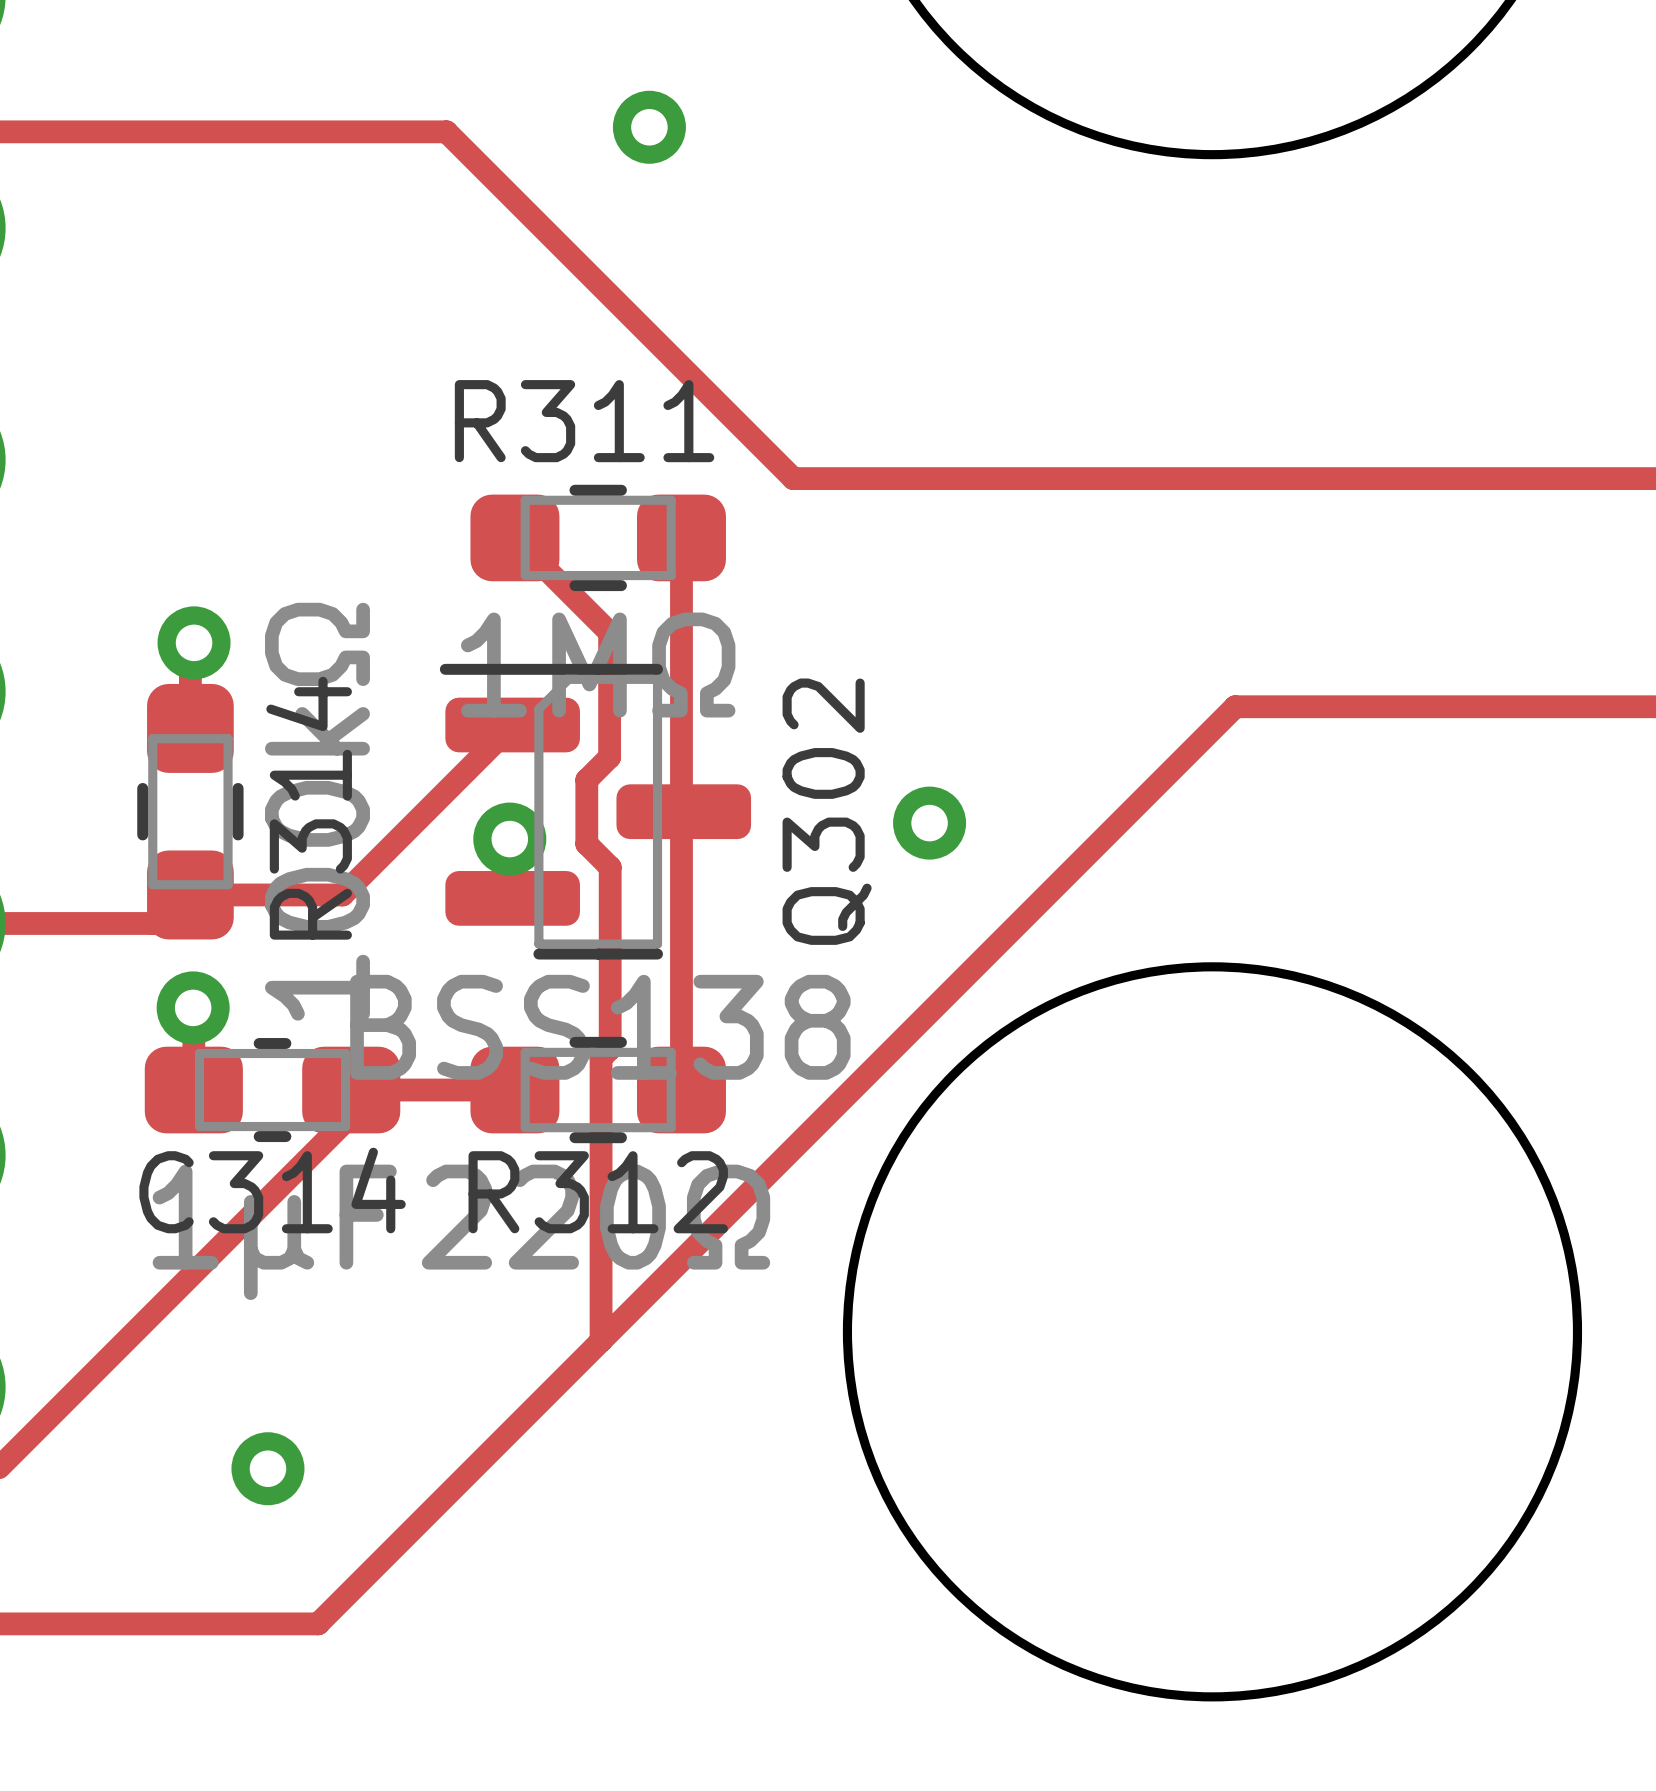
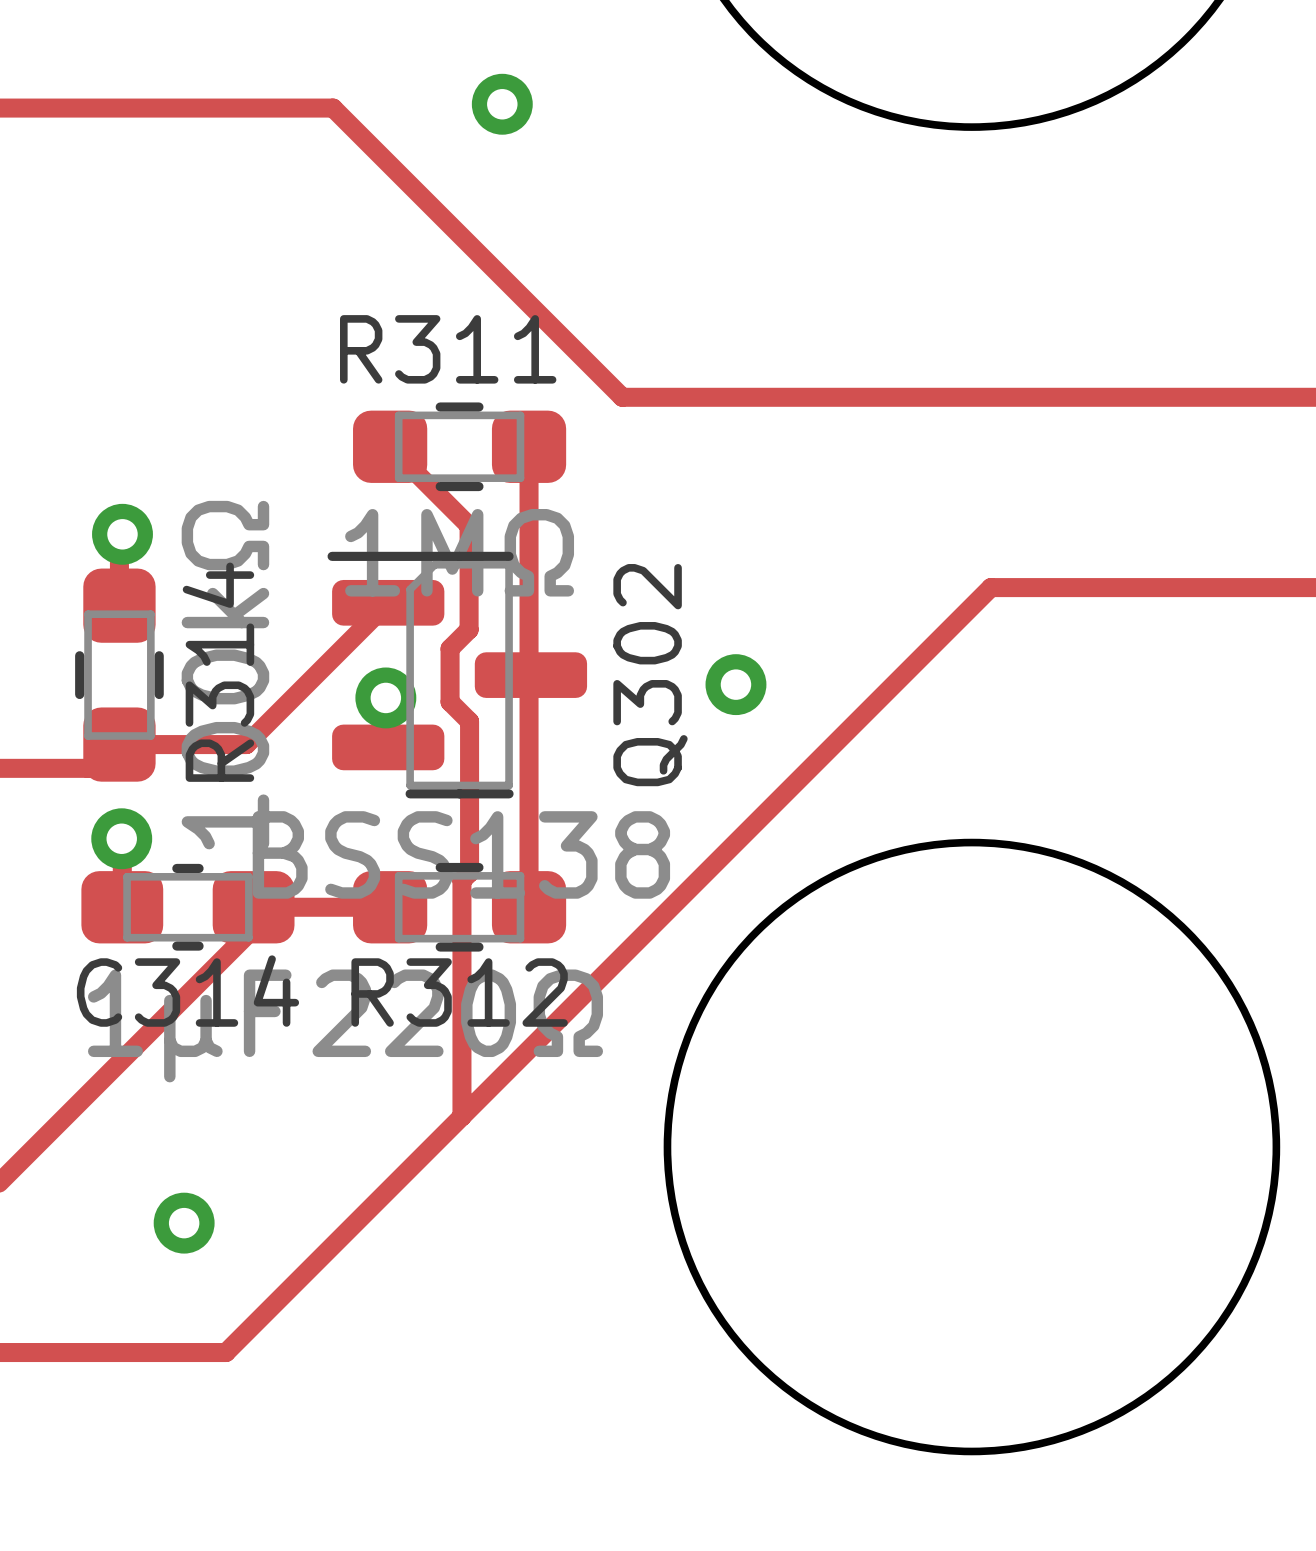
round board edge position: (1212, 1331) -> (971, 1147)

